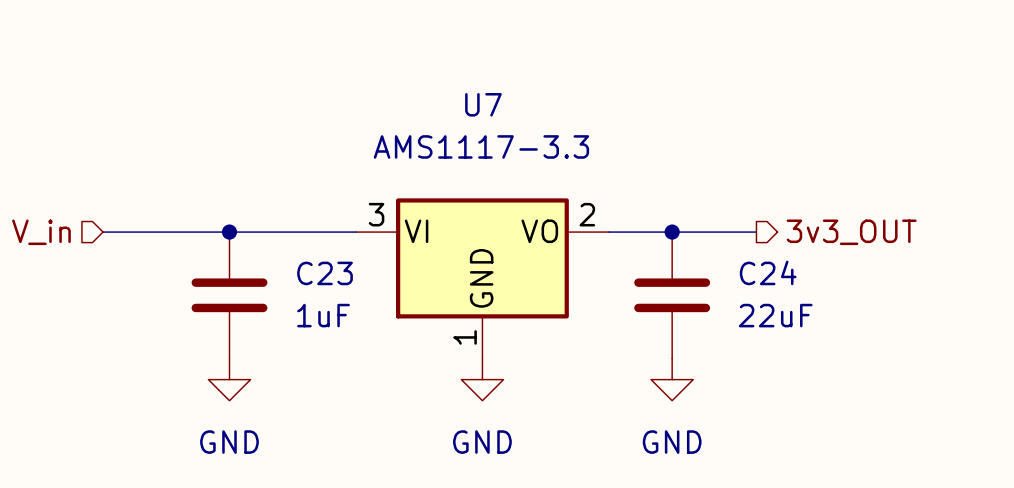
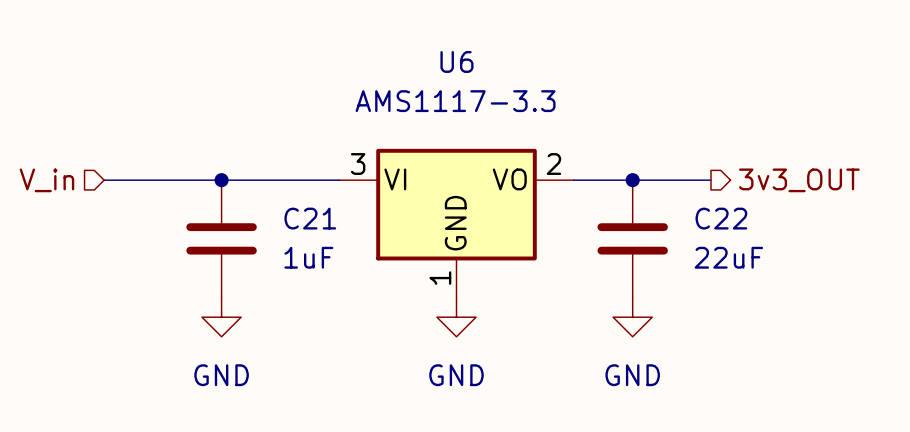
U7 name: U7 (483, 104) -> U6 (456, 61)
C24 name: C24 (768, 272) -> C22 (721, 218)
C23 name: C23 (325, 273) -> C21 (310, 218)

